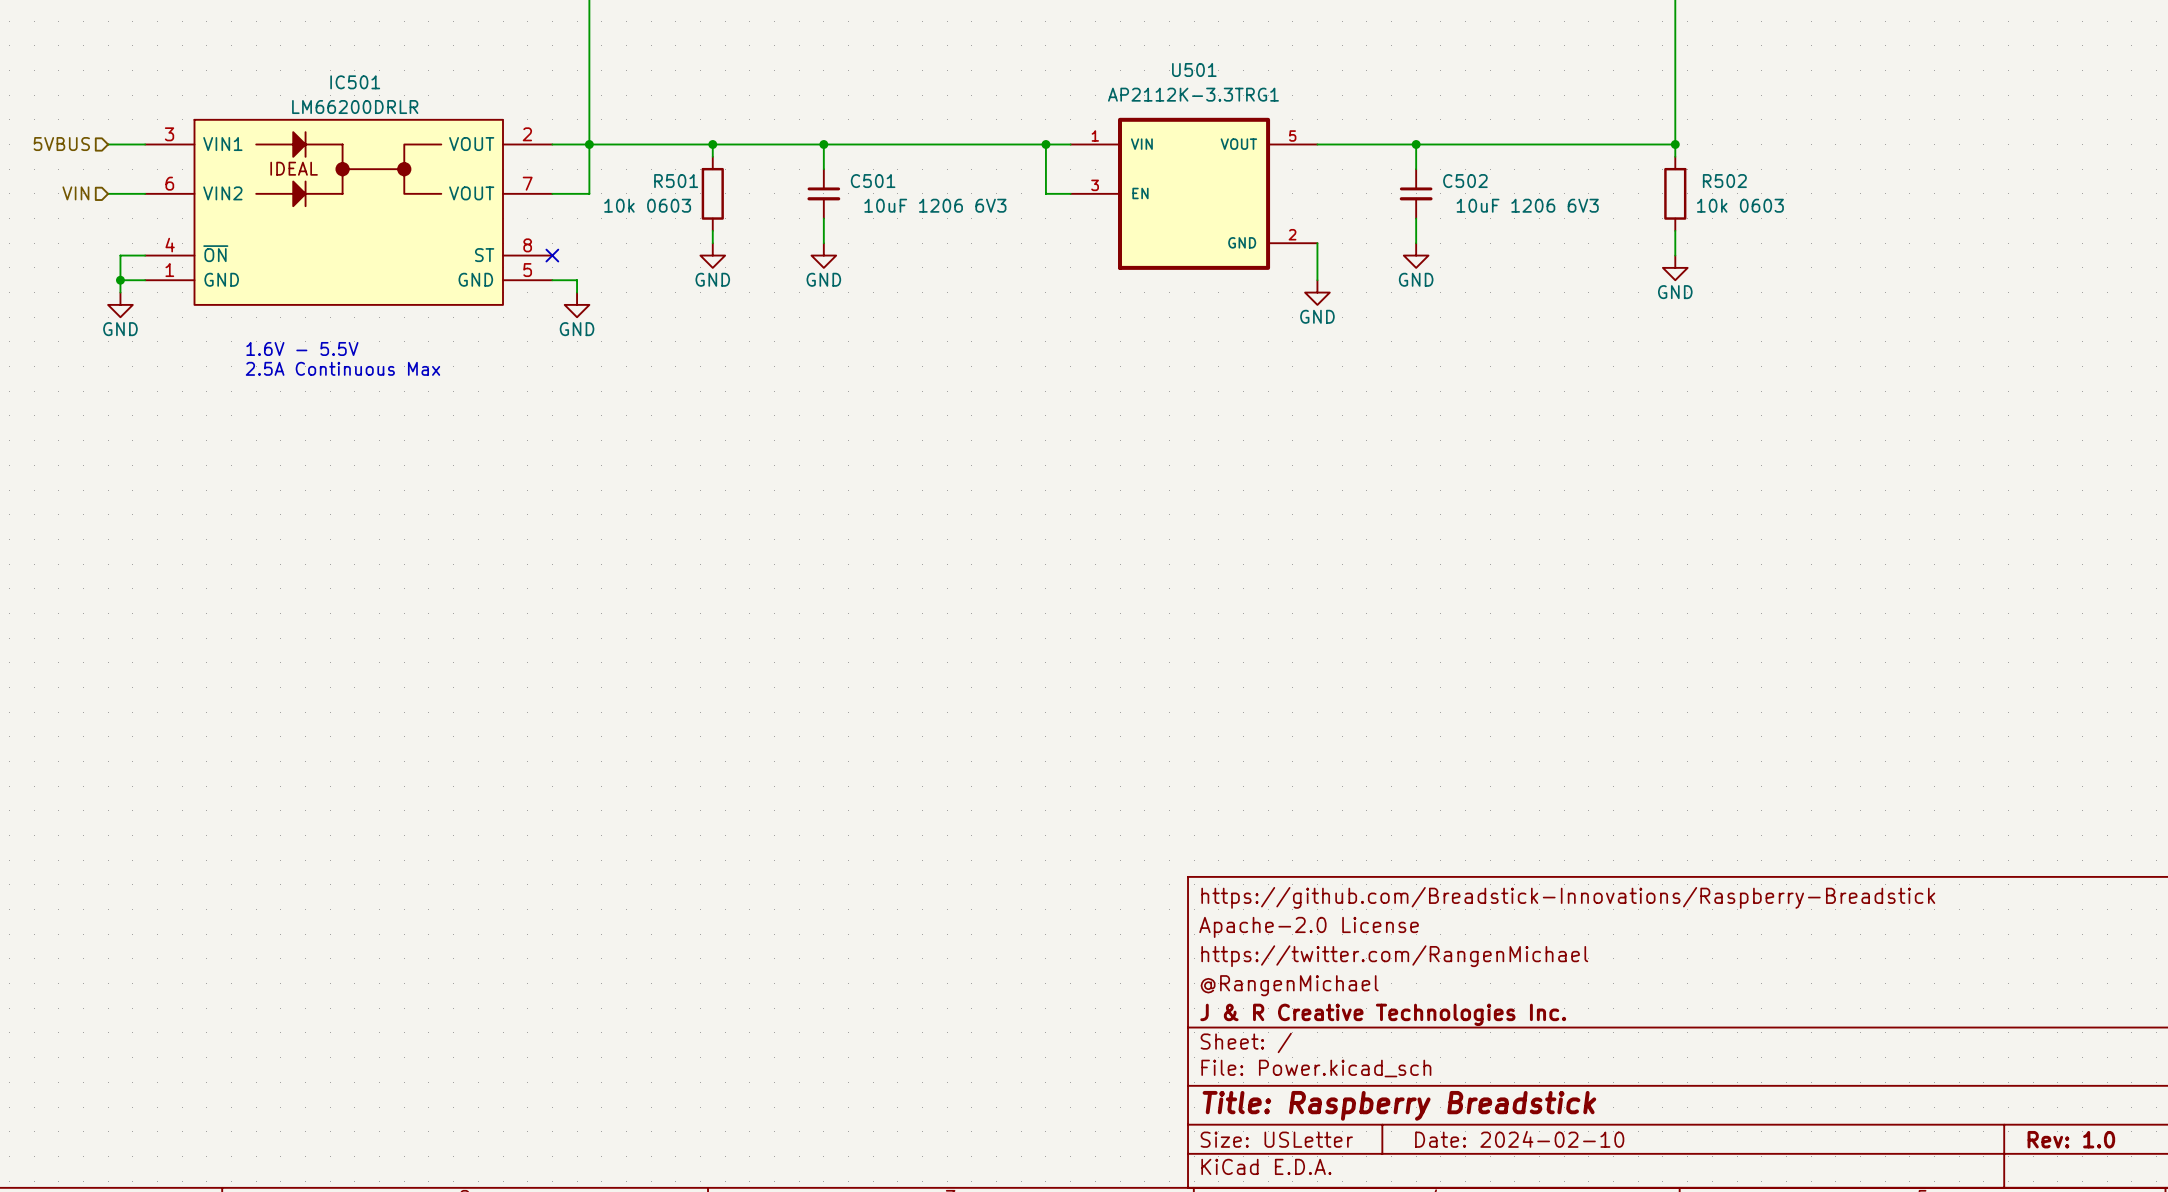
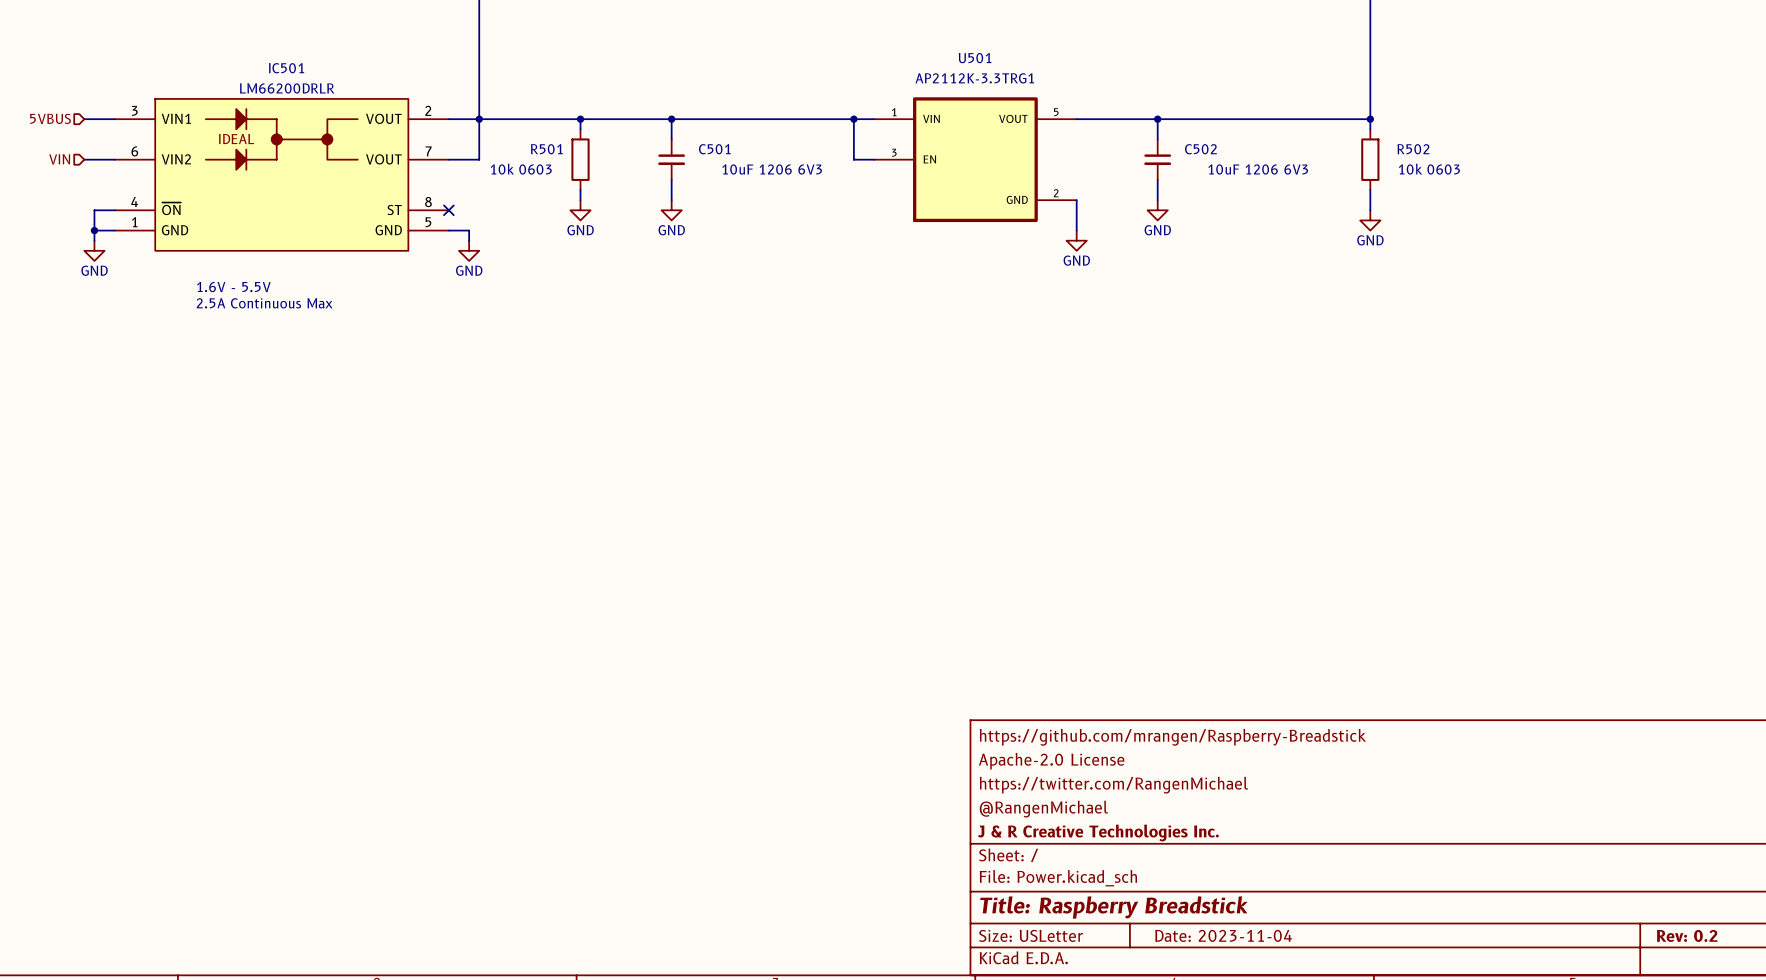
title block: https://github.com/Breadstick-Innovations/Raspberry-Breadstick (1568, 897) -> https://github.com/mrangen/Raspberry-Breadstick (1172, 737)
title block: Date: 2024-02-10 (1519, 1139) -> Date: 2023-11-04 (1223, 935)
title block: Rev: 1.0 (2071, 1139) -> Rev: 0.2 (1687, 935)

